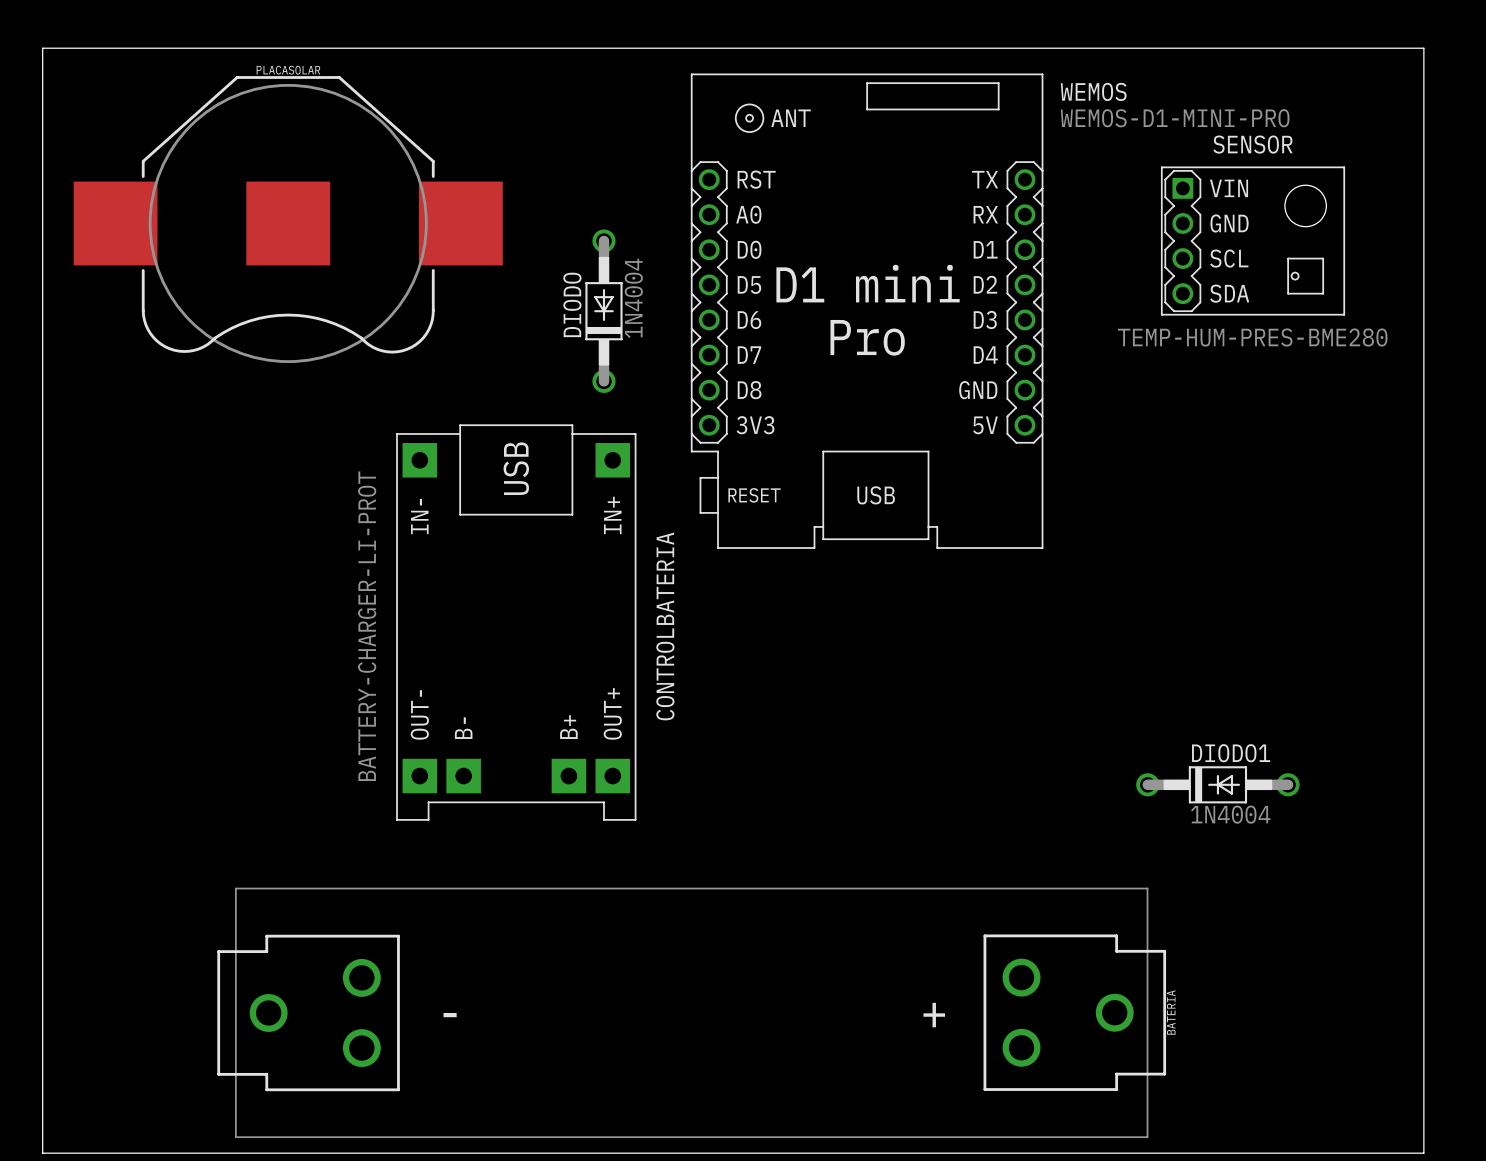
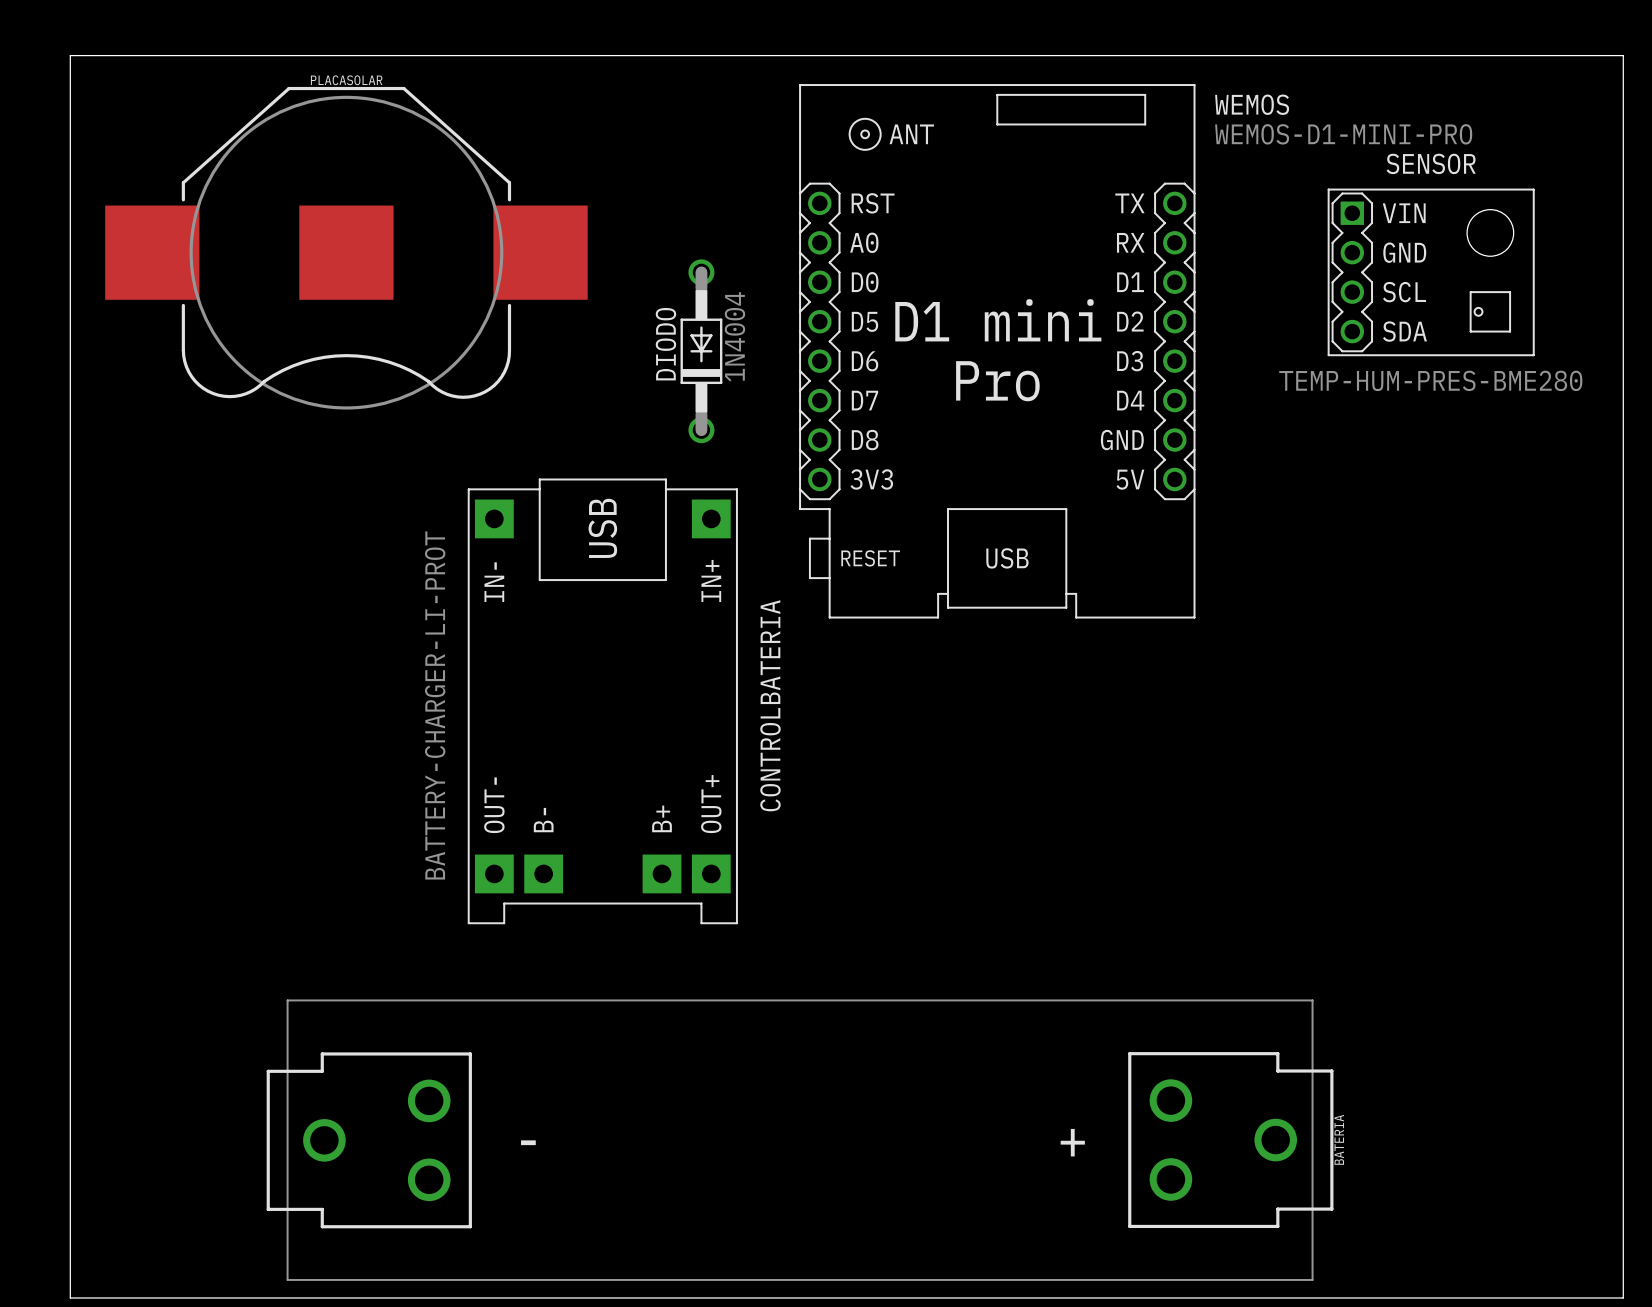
DIODO1: 1N4004 (1217, 784) -> none

